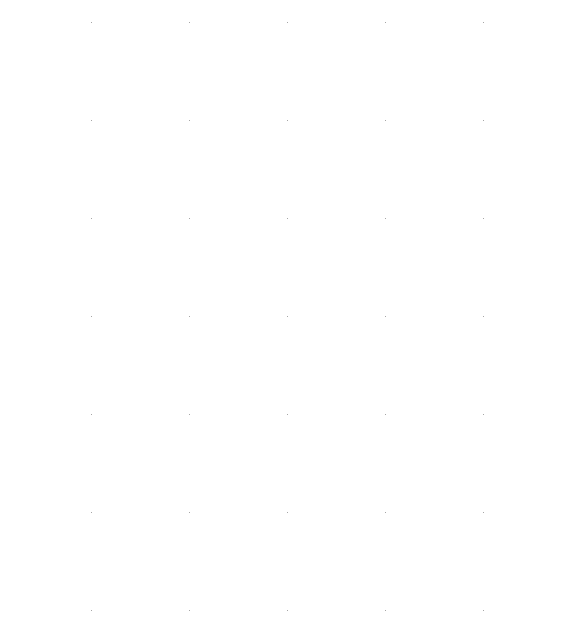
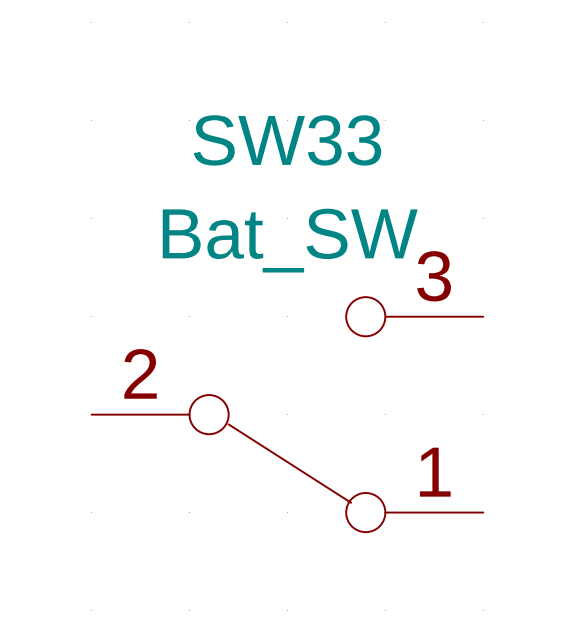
SW33: none -> Bat_SW (287, 414)

